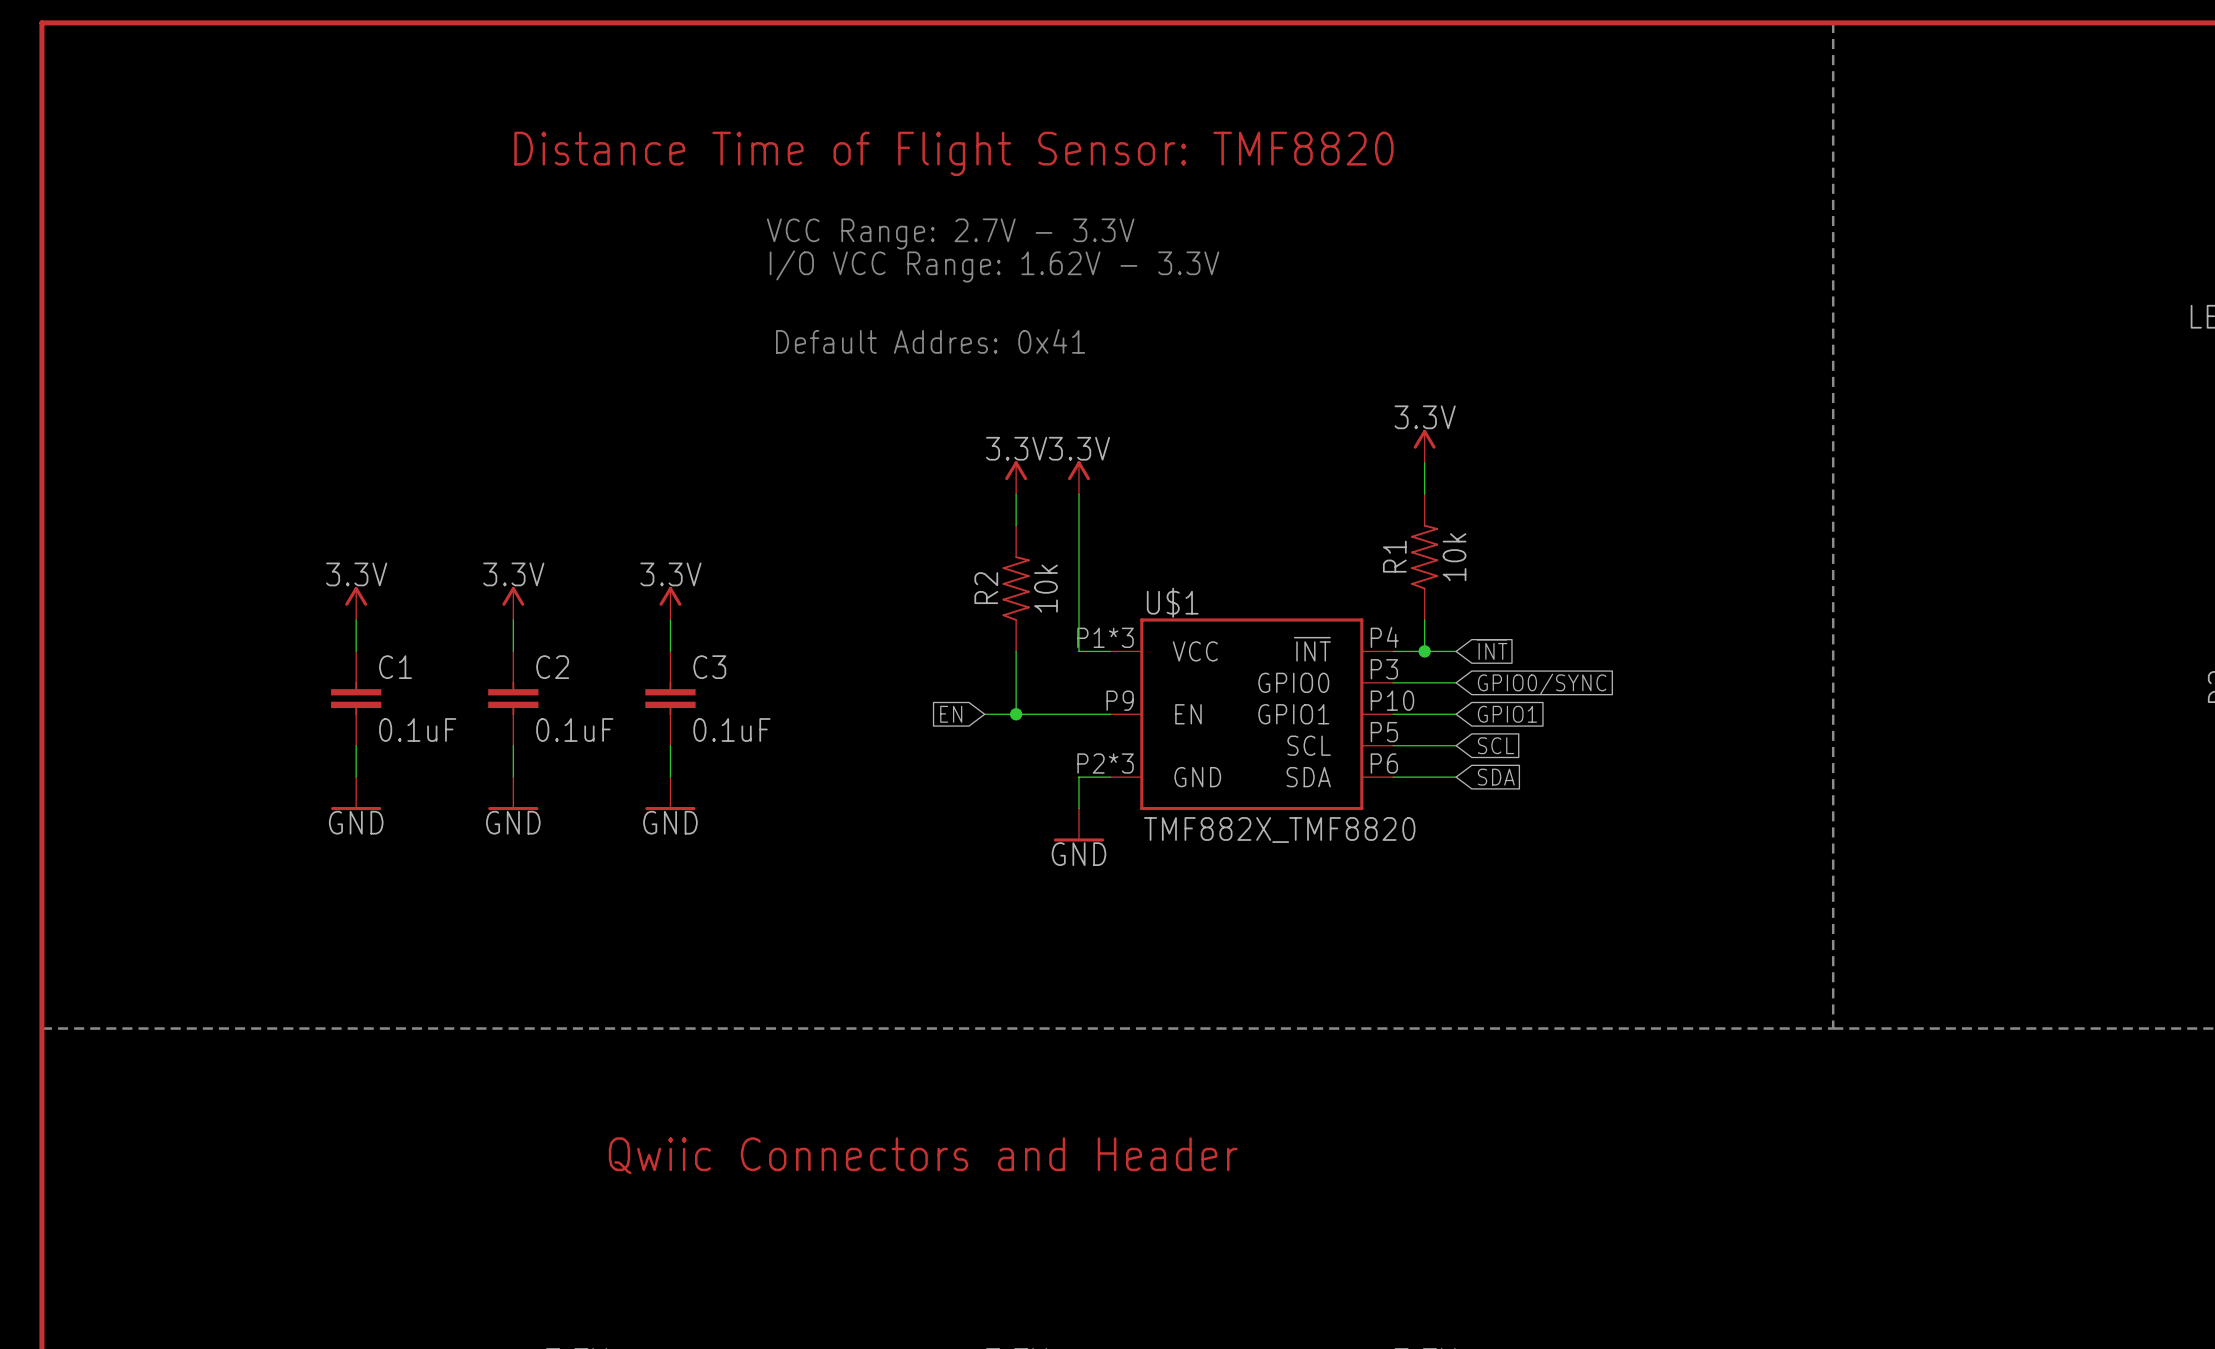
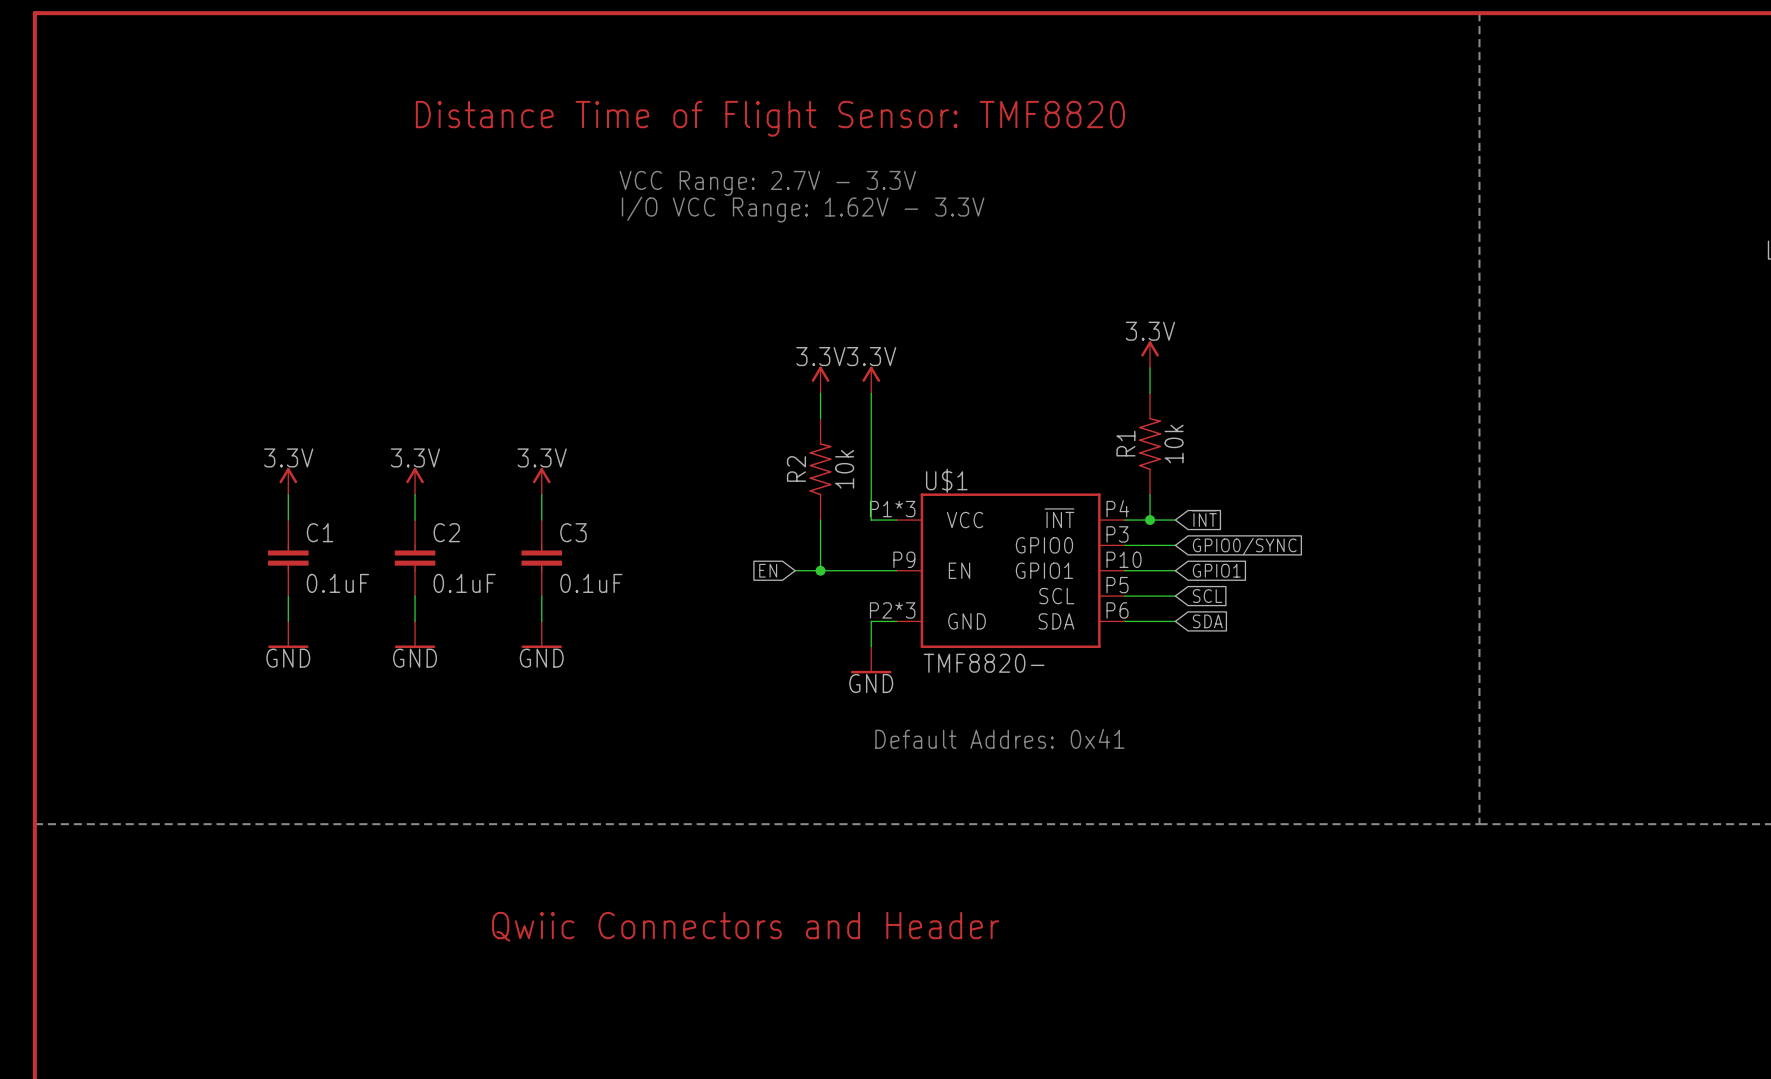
text: Default Addres: 0x41 (930, 341) -> none
U$1 value: TMF882X_TMF8820 (1279, 830) -> TMF8820- (984, 663)
text: none -> Default Addres: 0x41 (999, 738)

